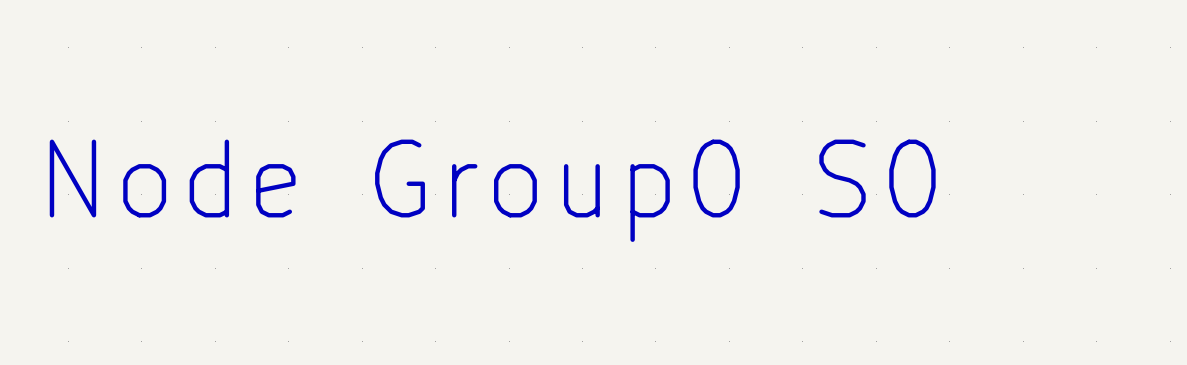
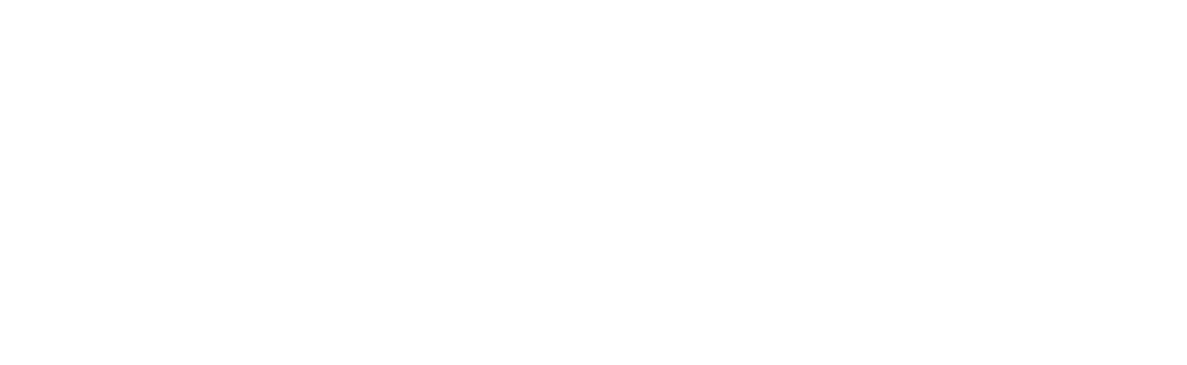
text: Node Group0 S0 (492, 190) -> none

